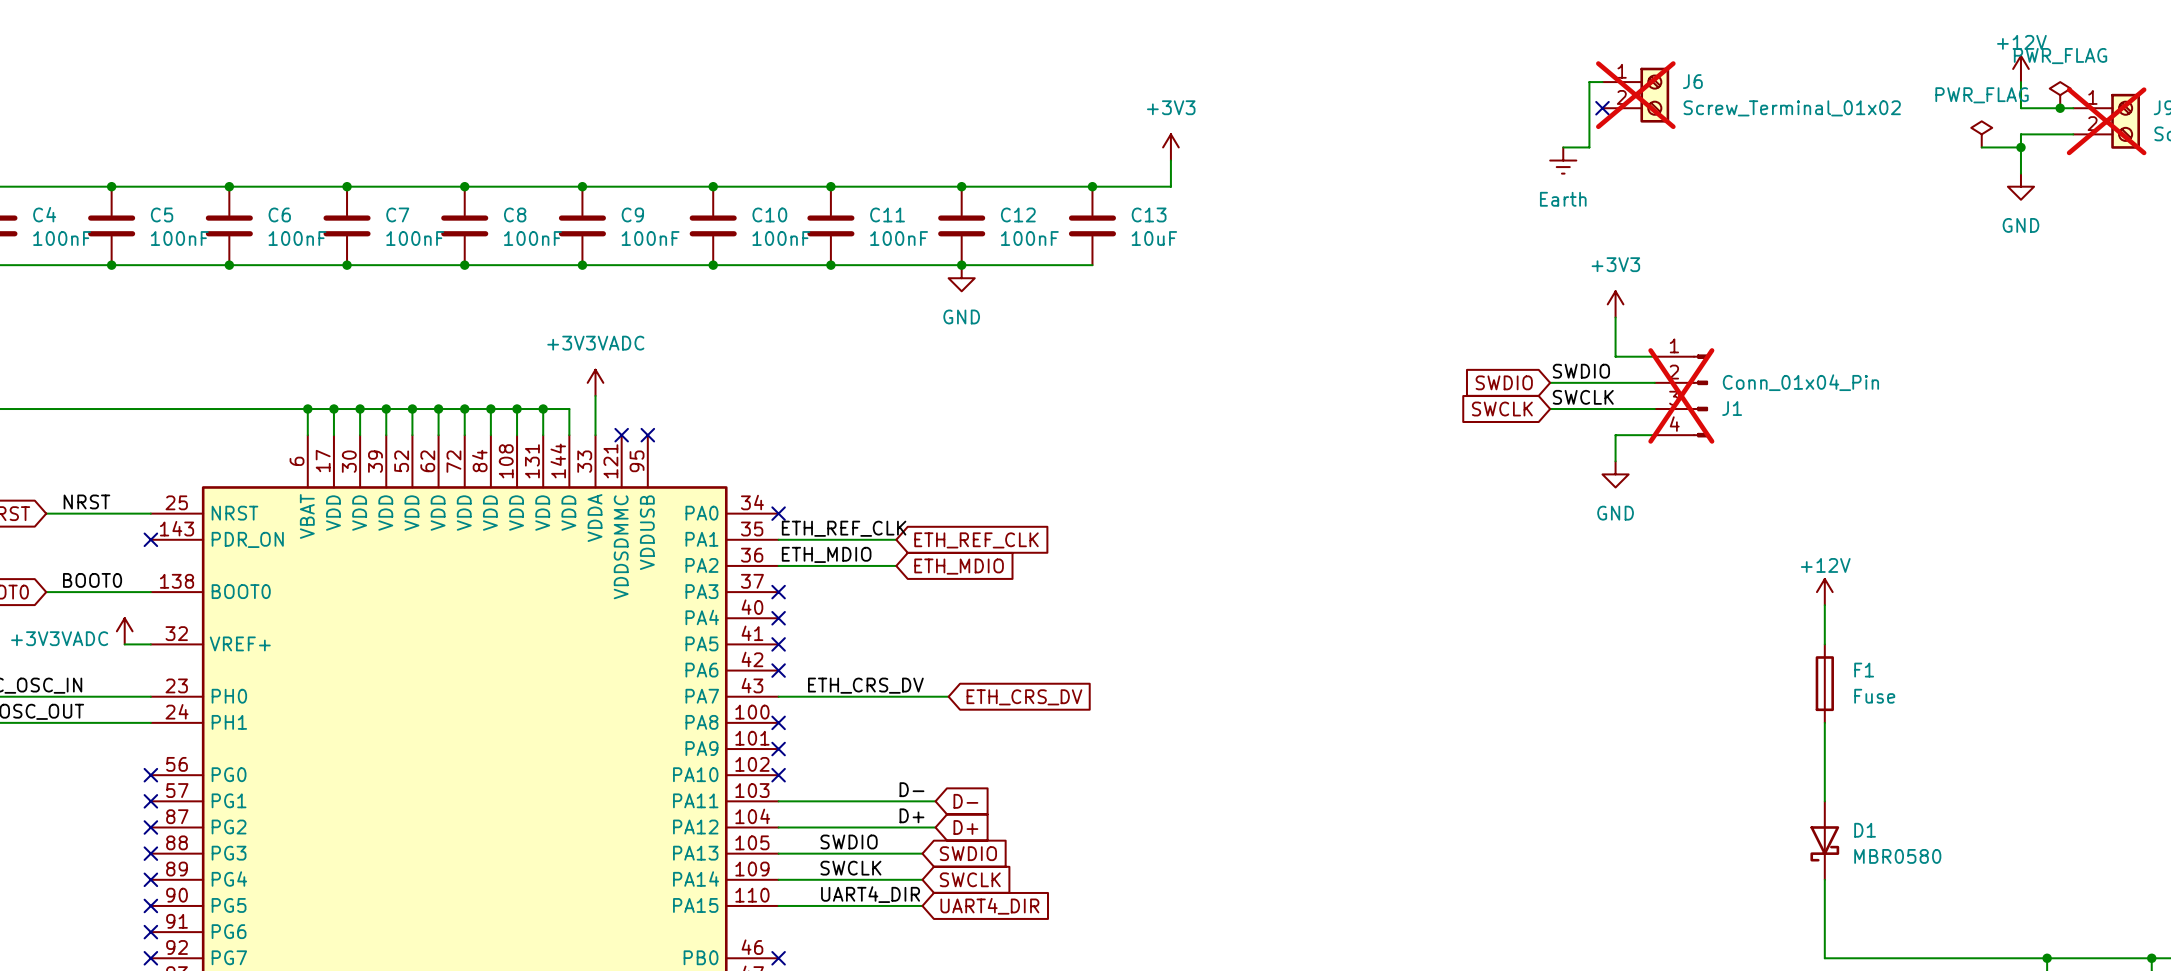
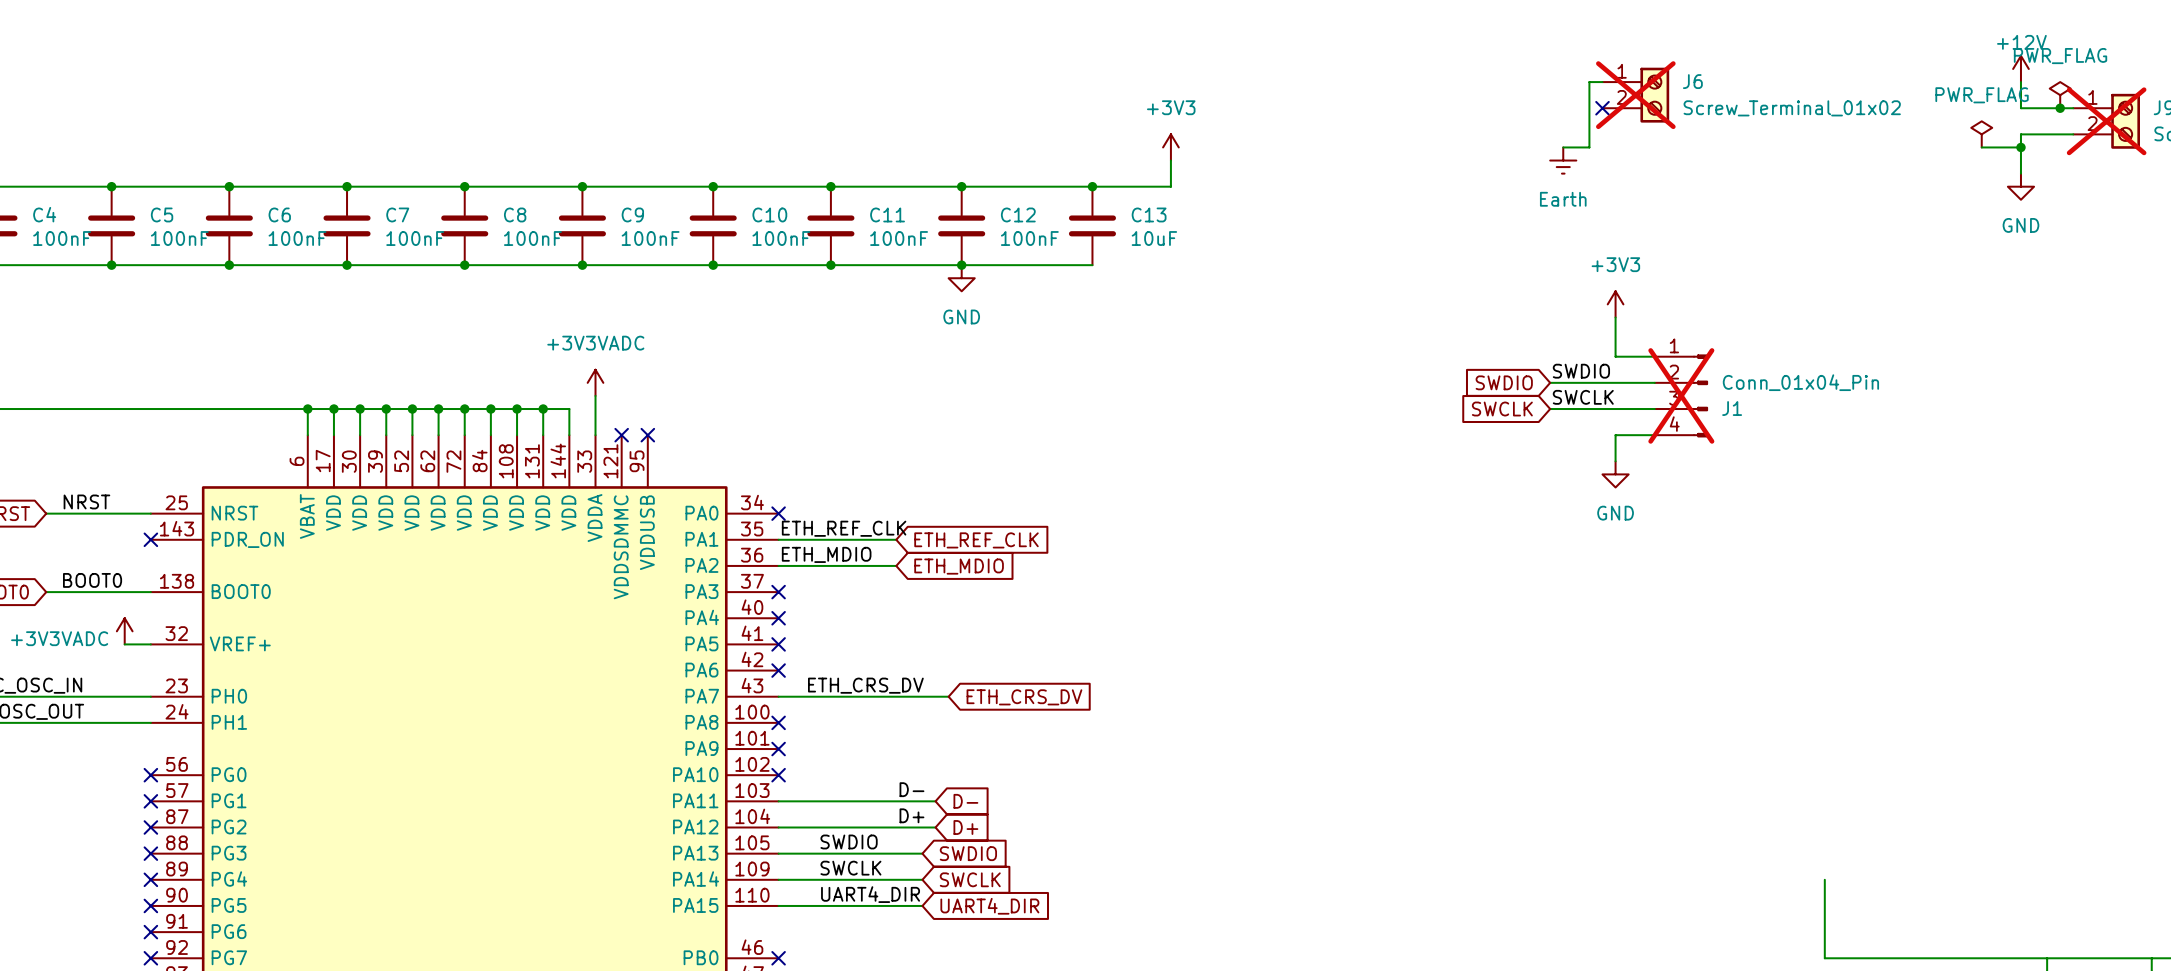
power symbol: +12V (1824, 592) -> none
wire: (1824, 605) (1824, 644) -> none
F1: Fuse (1824, 683) -> none
wire: (1824, 722) (1824, 801) -> none
D1: MBR0580 (1824, 840) -> none
junction: (2047, 958) -> none
junction: (2151, 958) -> none

